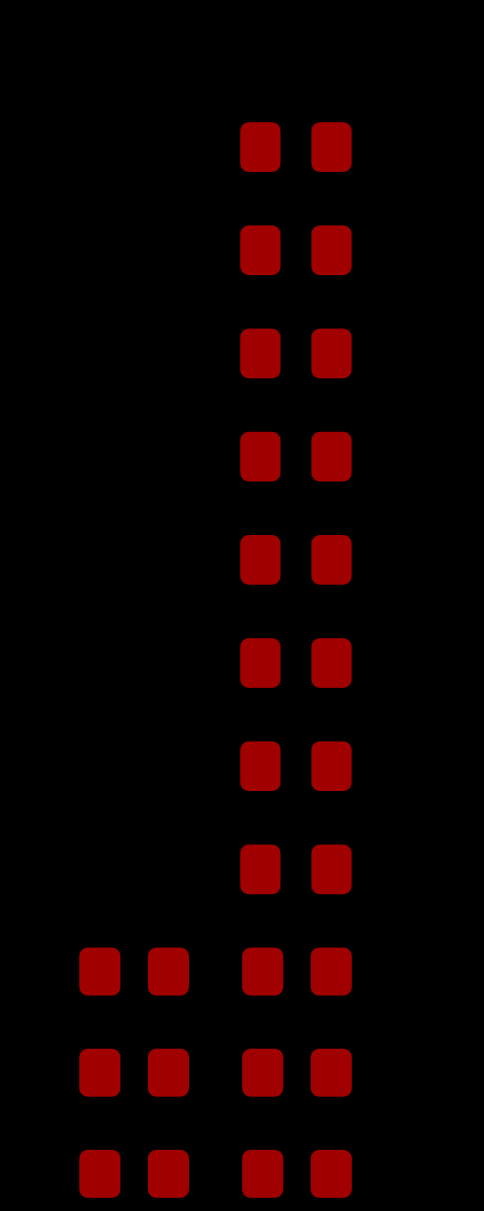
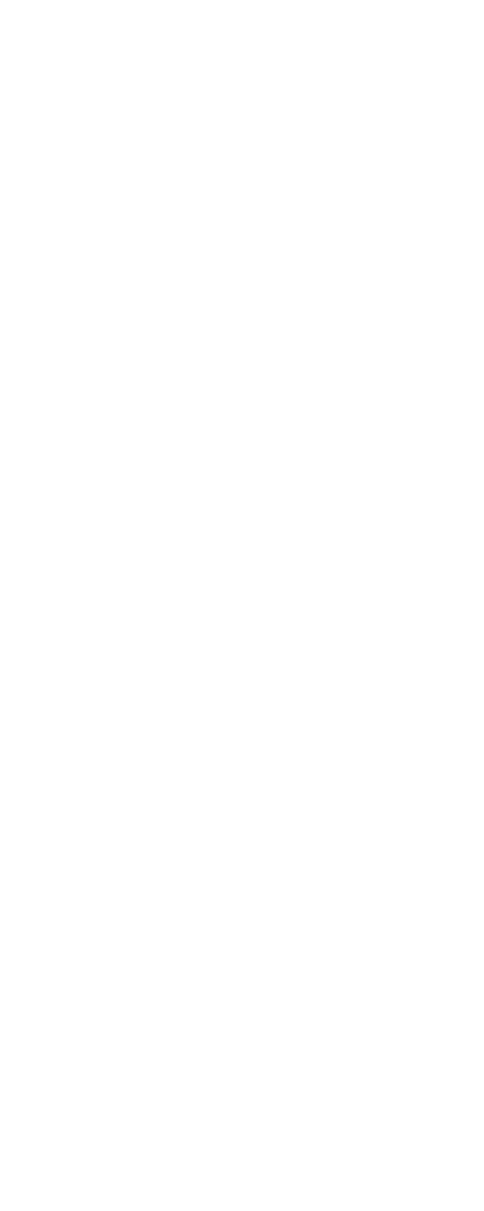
part: (295, 147) -> none
part: (295, 250) -> none
part: (295, 353) -> none
part: (295, 456) -> none
part: (295, 559) -> none
part: (295, 663) -> none
part: (295, 766) -> none
part: (295, 869) -> none
part: (134, 971) -> none
part: (296, 971) -> none
part: (134, 1072) -> none
part: (296, 1072) -> none
part: (134, 1173) -> none
part: (296, 1173) -> none

